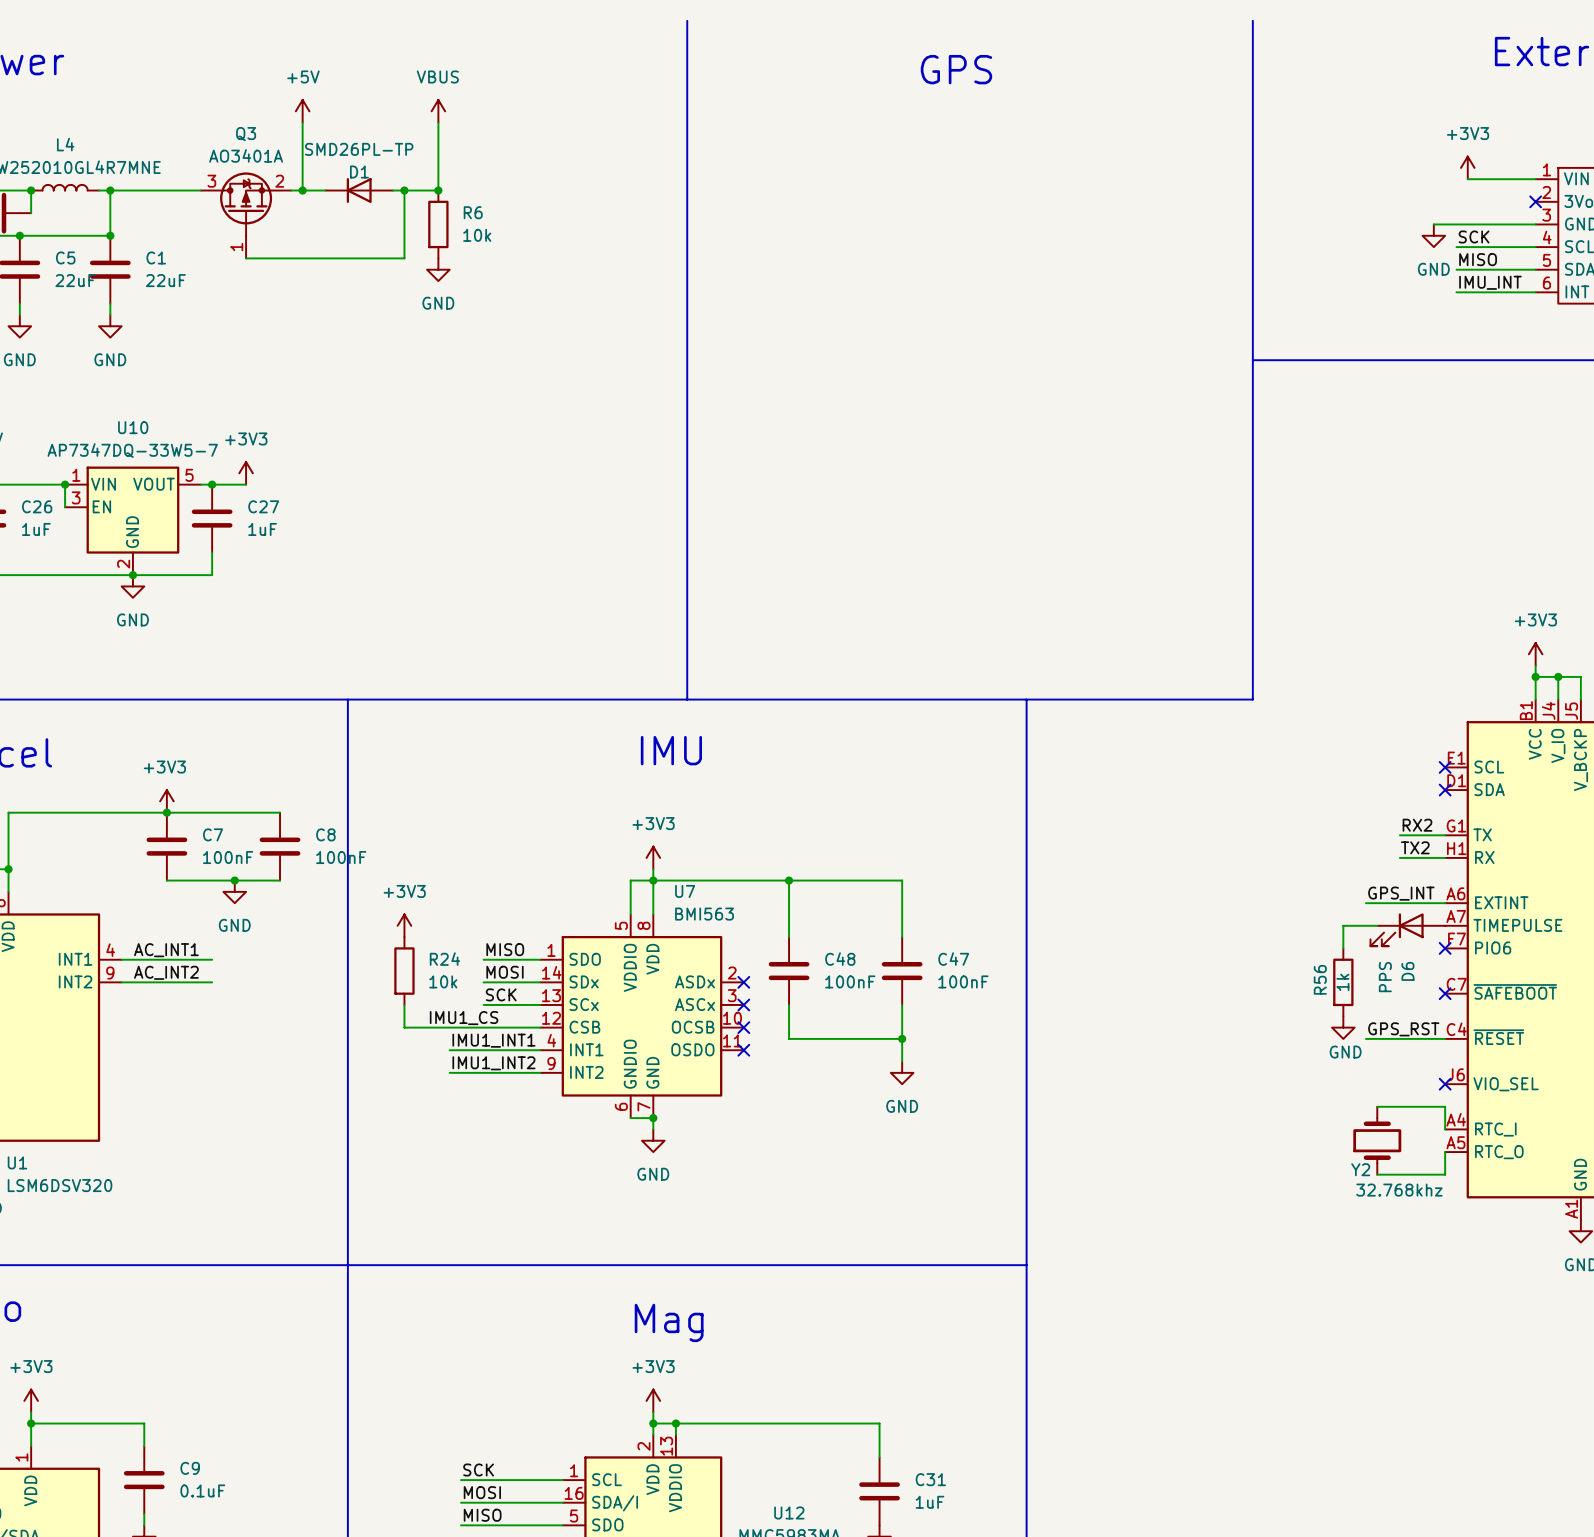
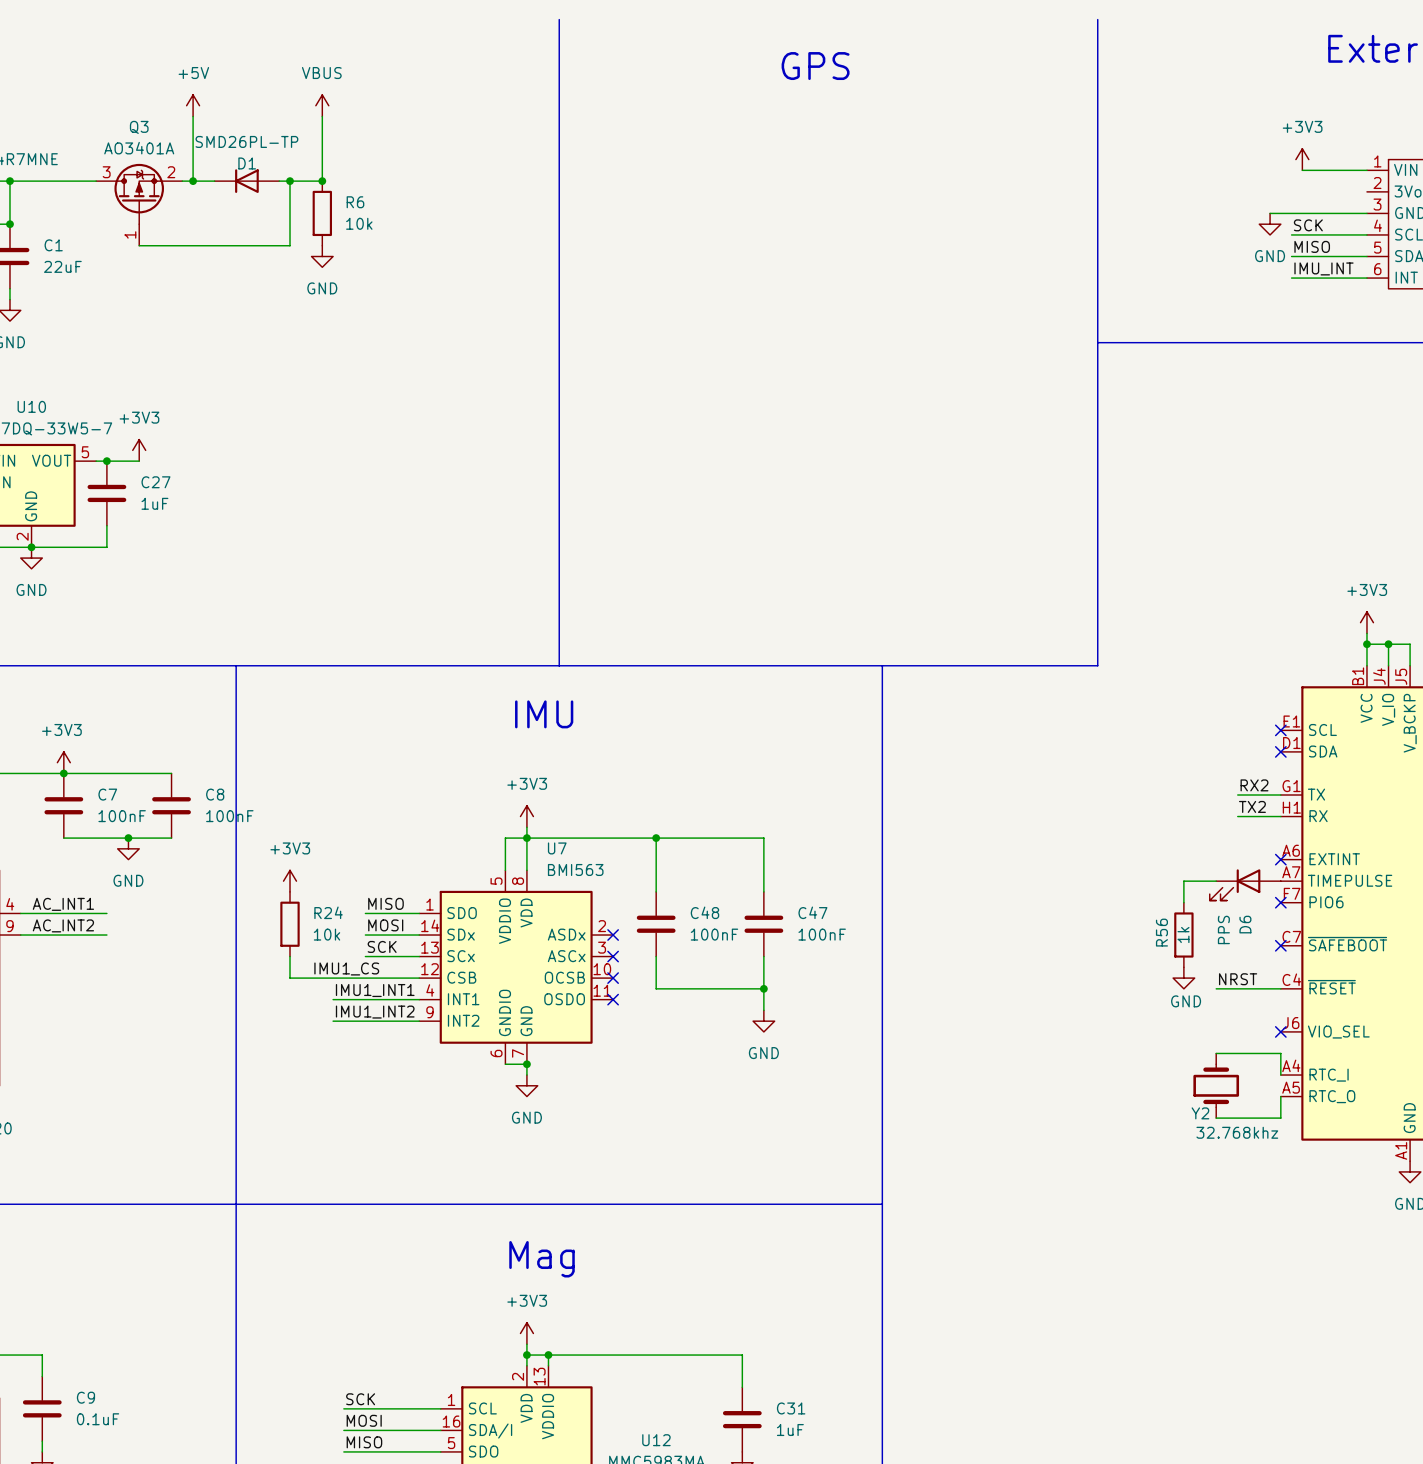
no-connect mark: (1535, 201) -> none
label: GPS_INT (1401, 893) -> none
wire: (1365, 903) (1445, 903) -> none
no-connect mark: none -> (1280, 859)
label: none -> NRST (1238, 979)
label: GPS_RST (1403, 1029) -> none
wire: (1365, 1038) (1377, 1038) -> none

